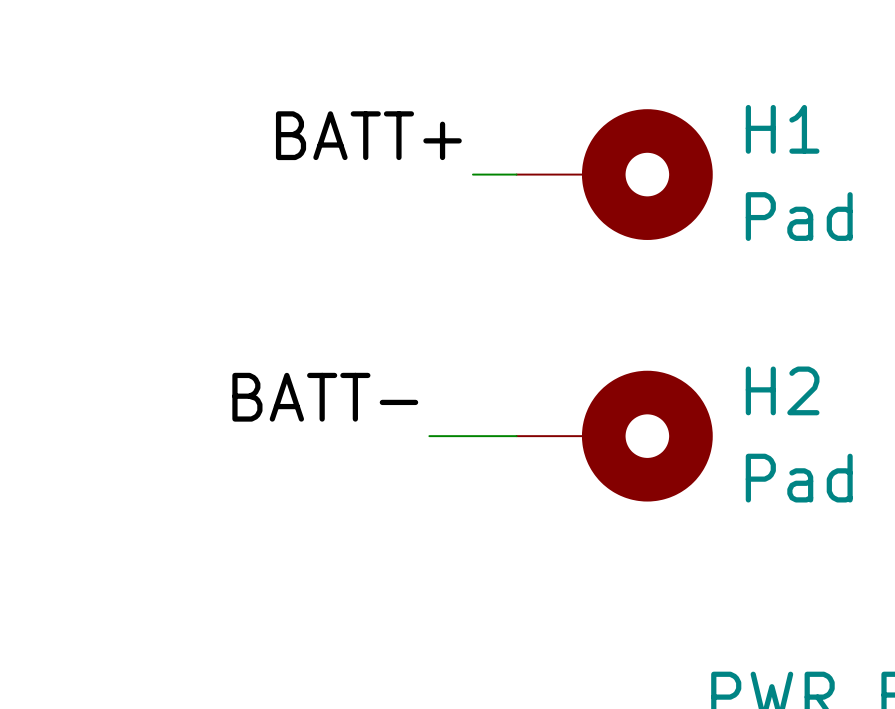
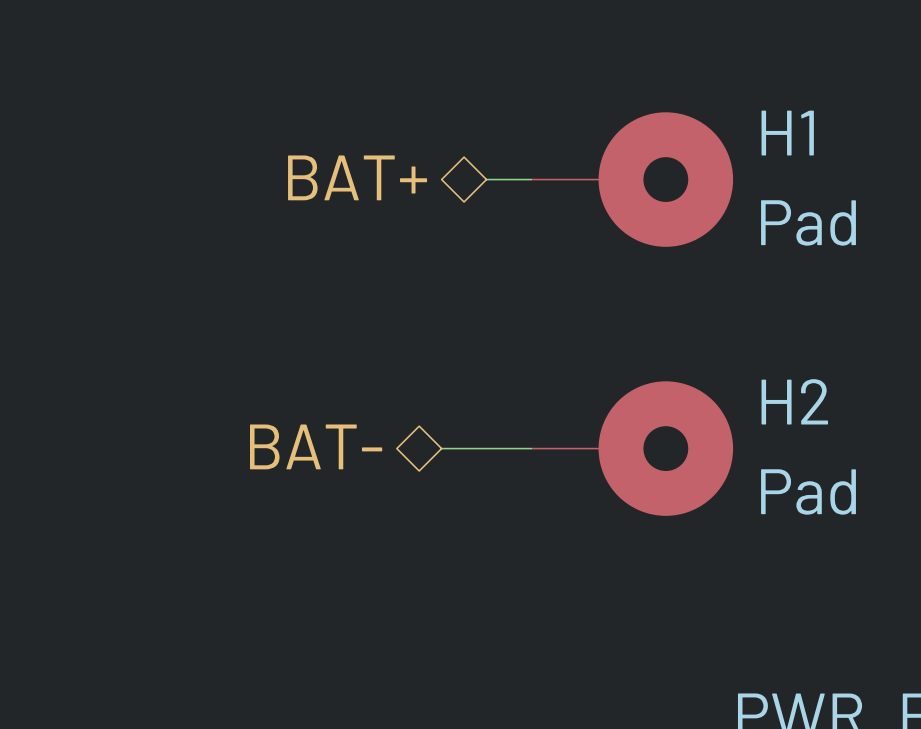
label: BATT+ (368, 135) -> none
hierarchical label: none -> BAT+ (357, 177)
label: BATT- (325, 397) -> none
hierarchical label: none -> BAT- (316, 446)

